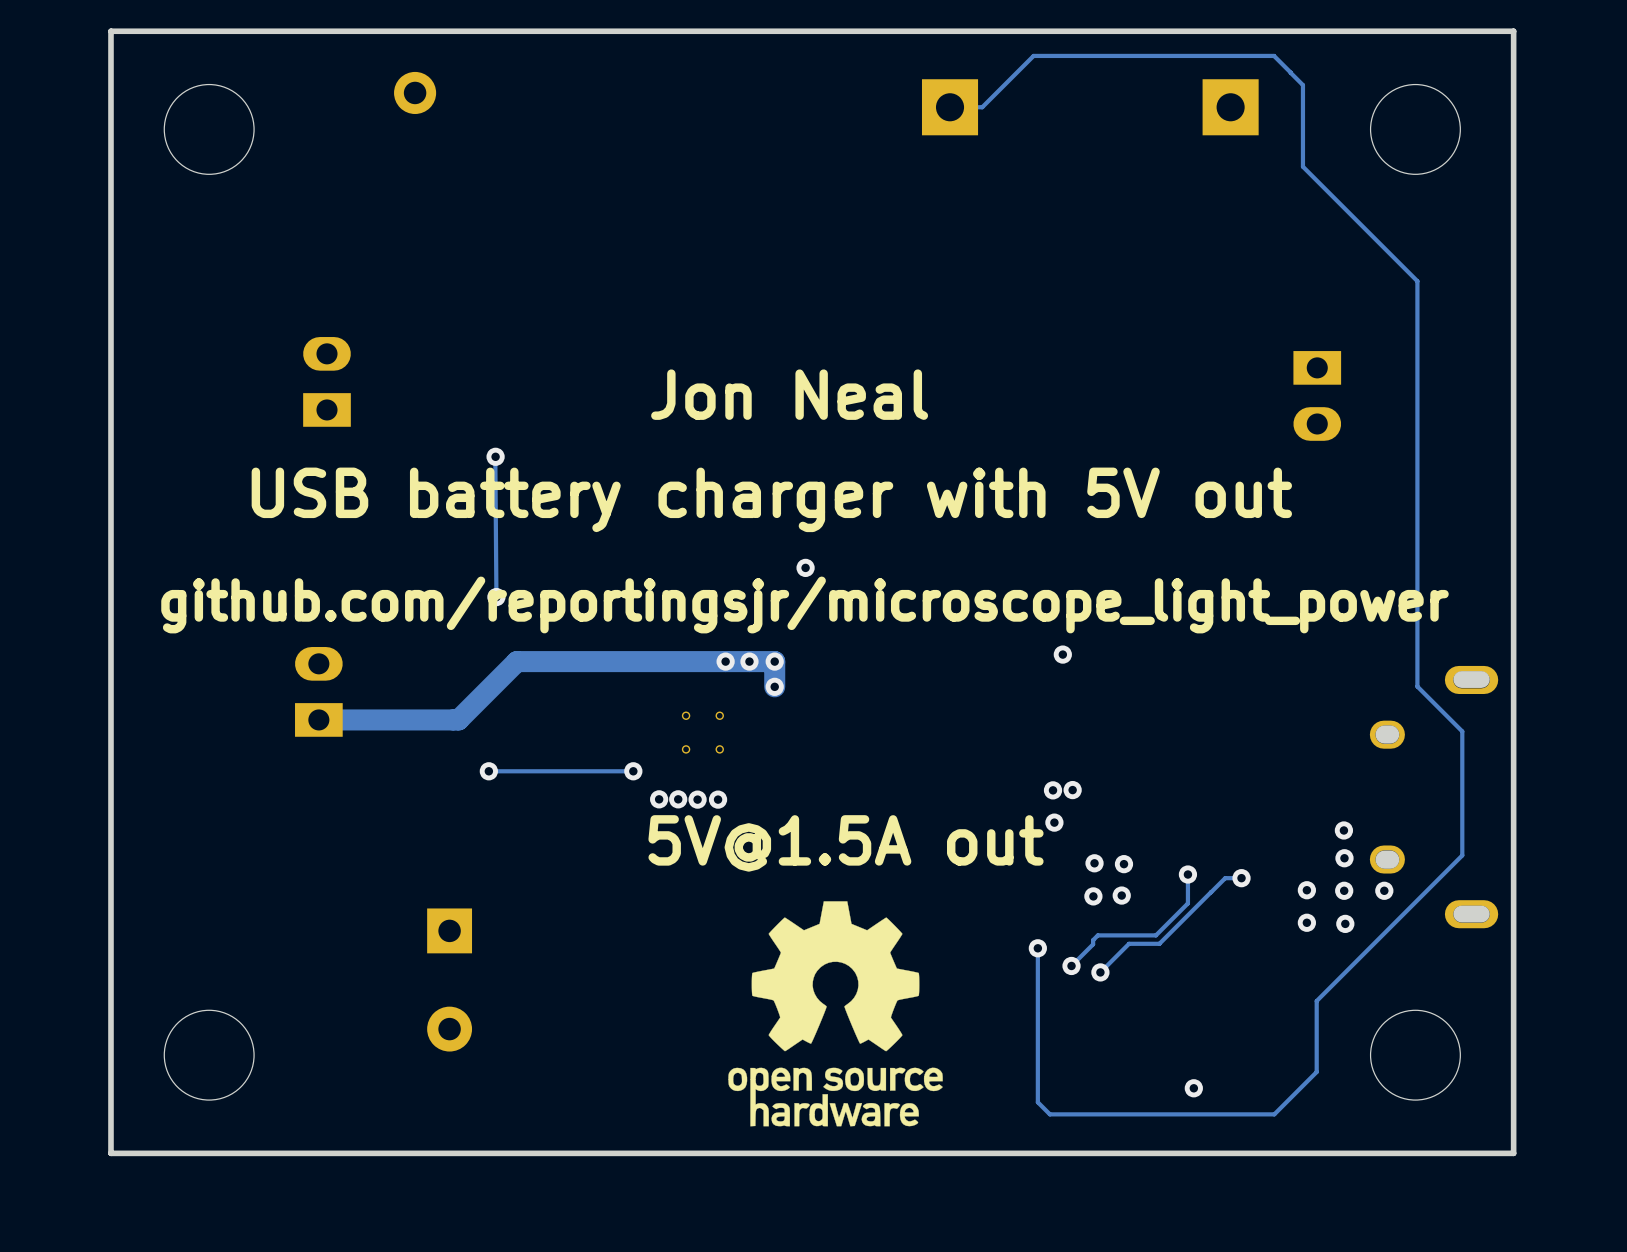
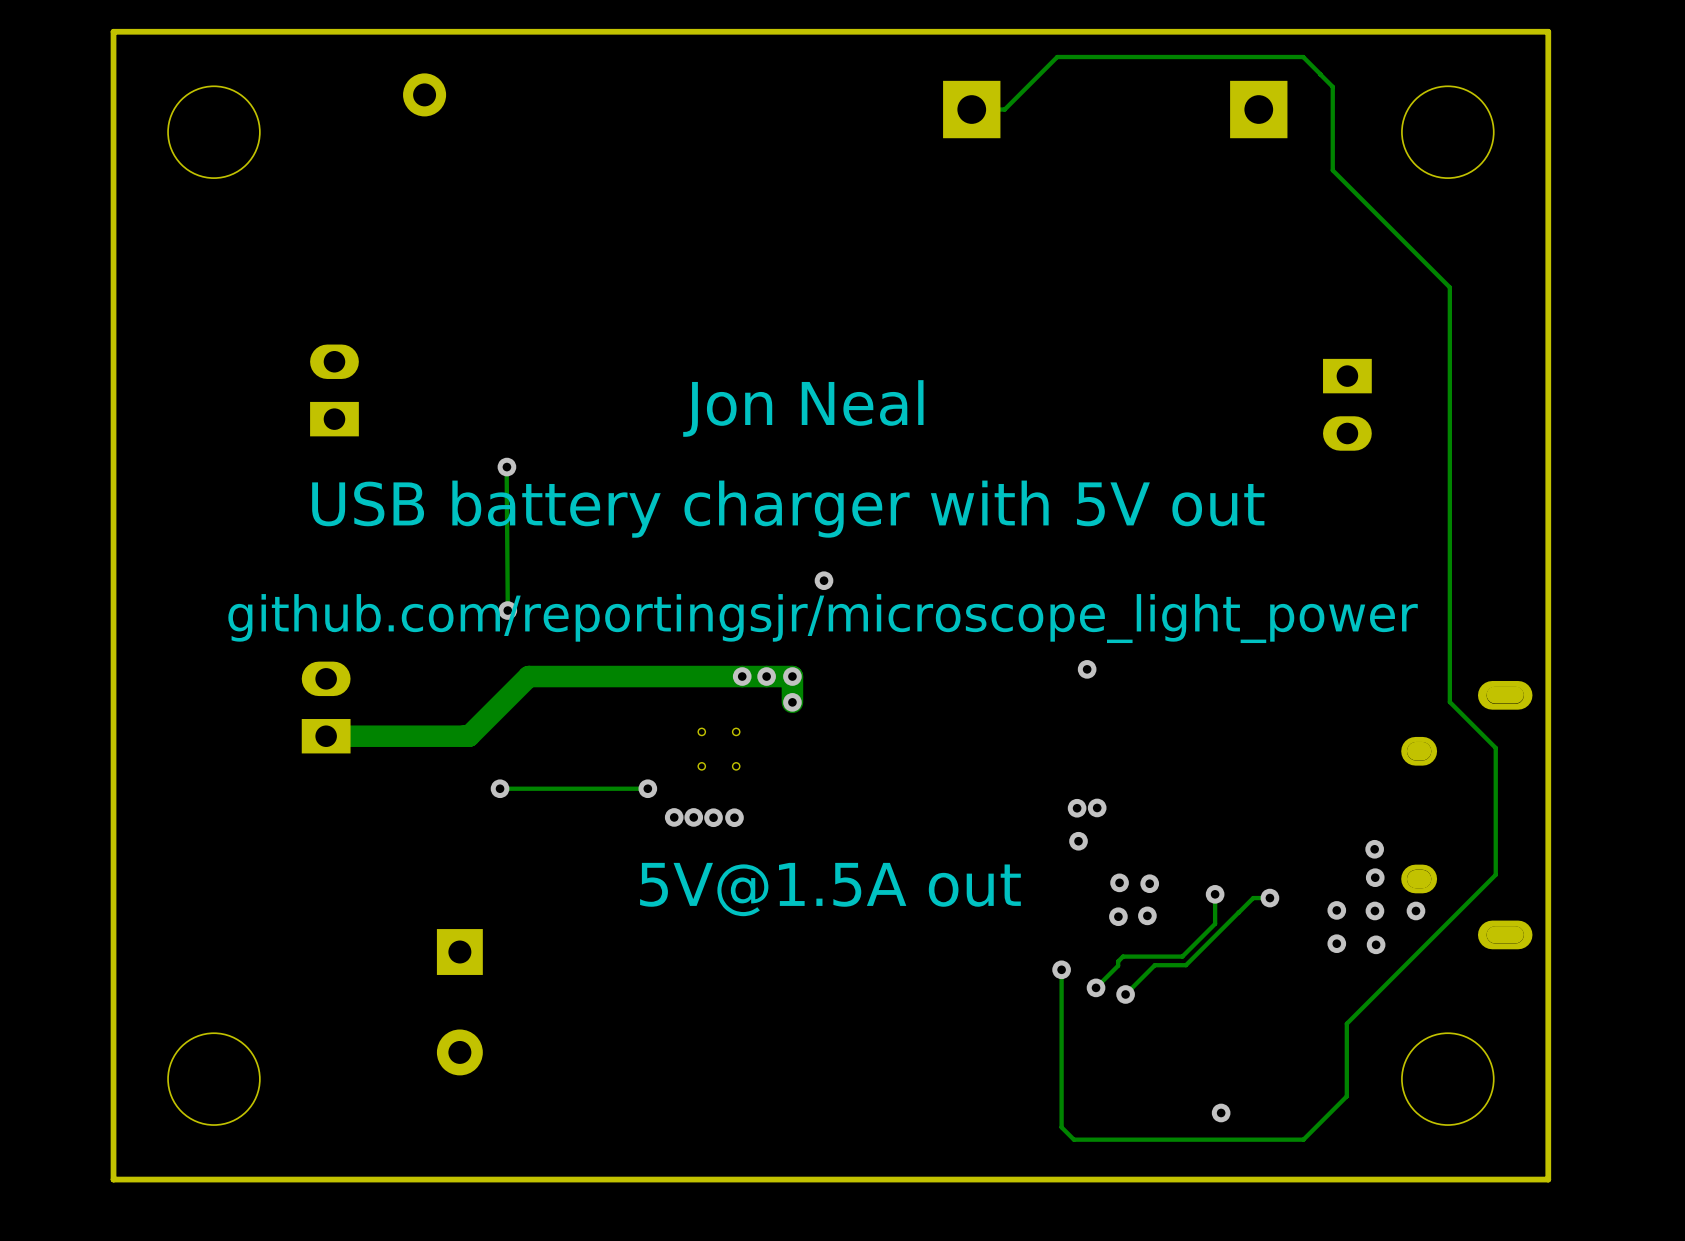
text position: 5V@1.5A out (846, 843) -> 5V@1.5A out (830, 889)
drawing: [728, 901, 943, 1127] -> none

